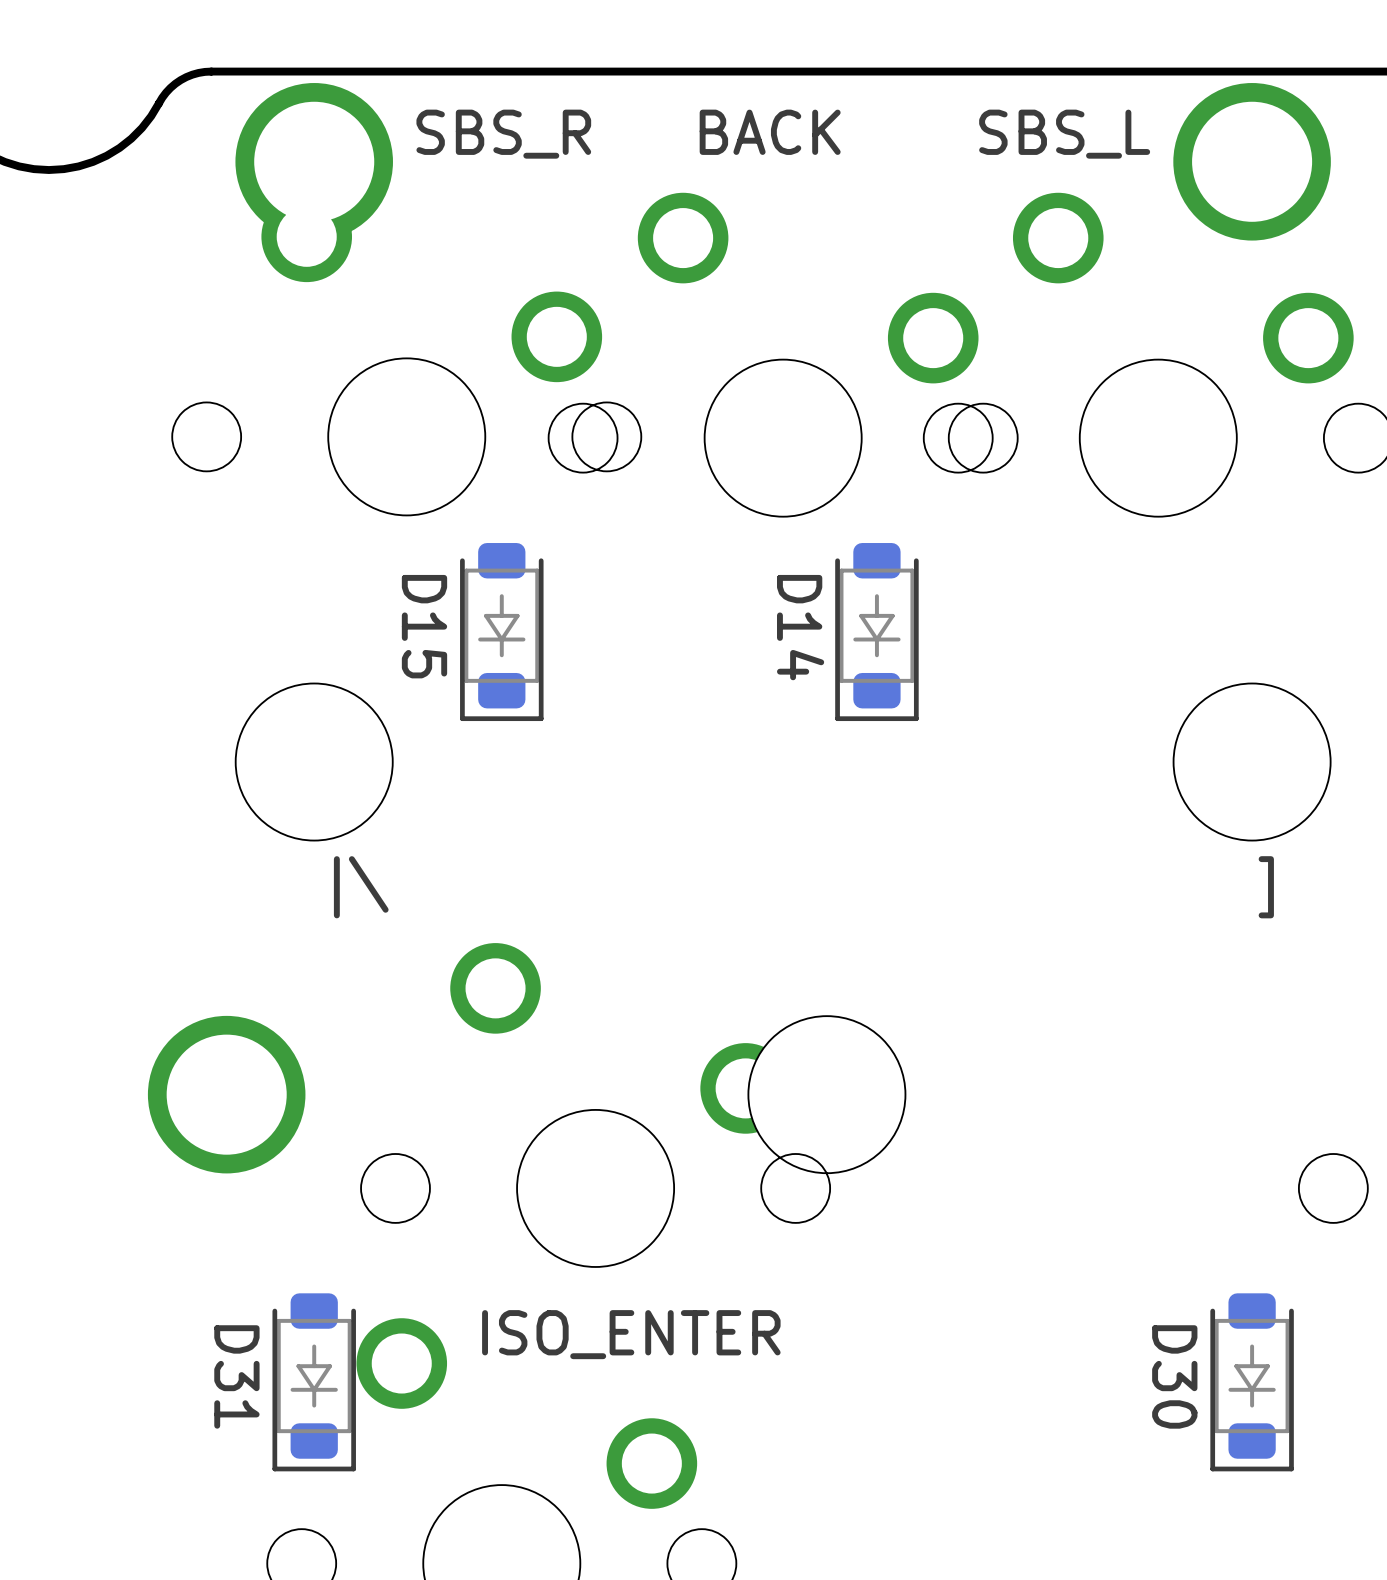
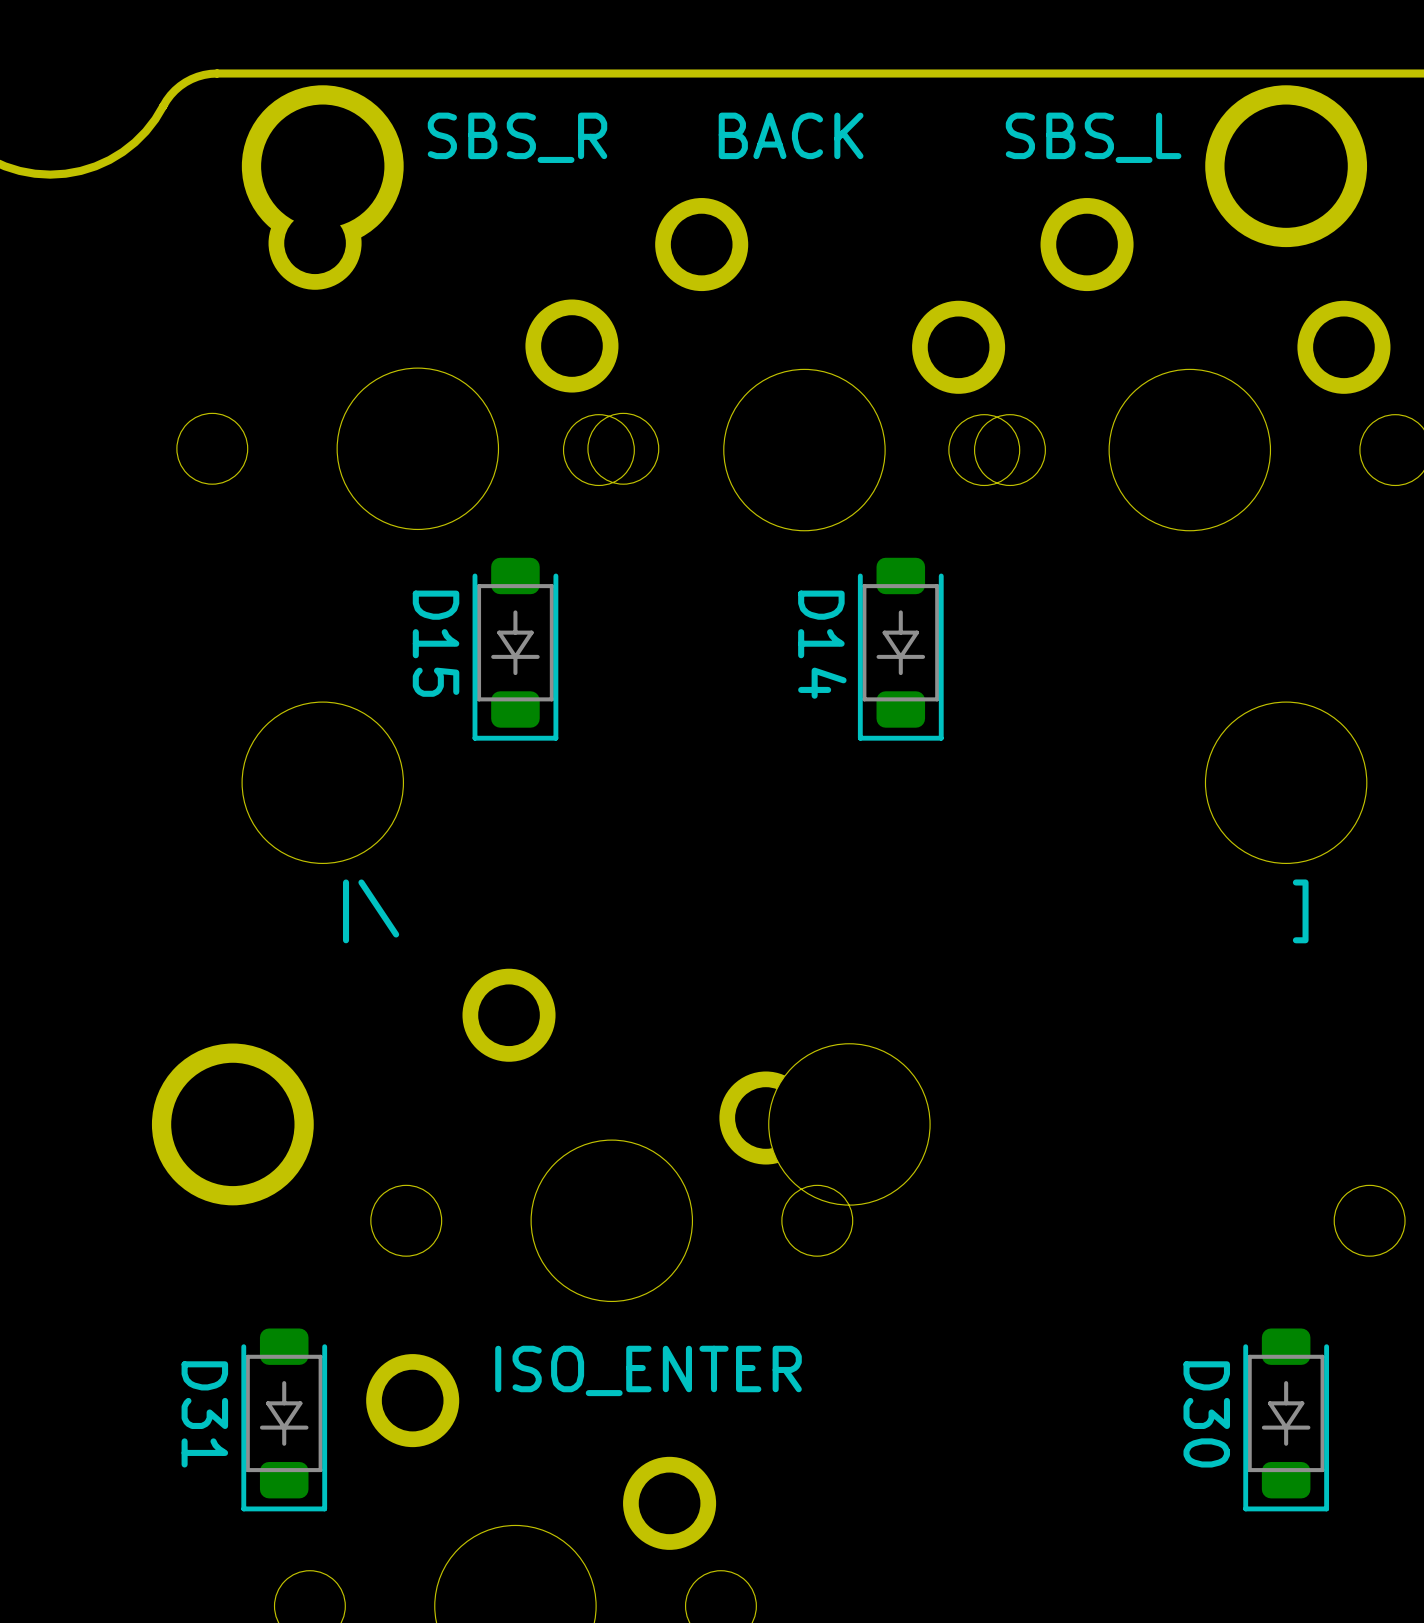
D31 position: (314, 1382) -> (284, 1419)

